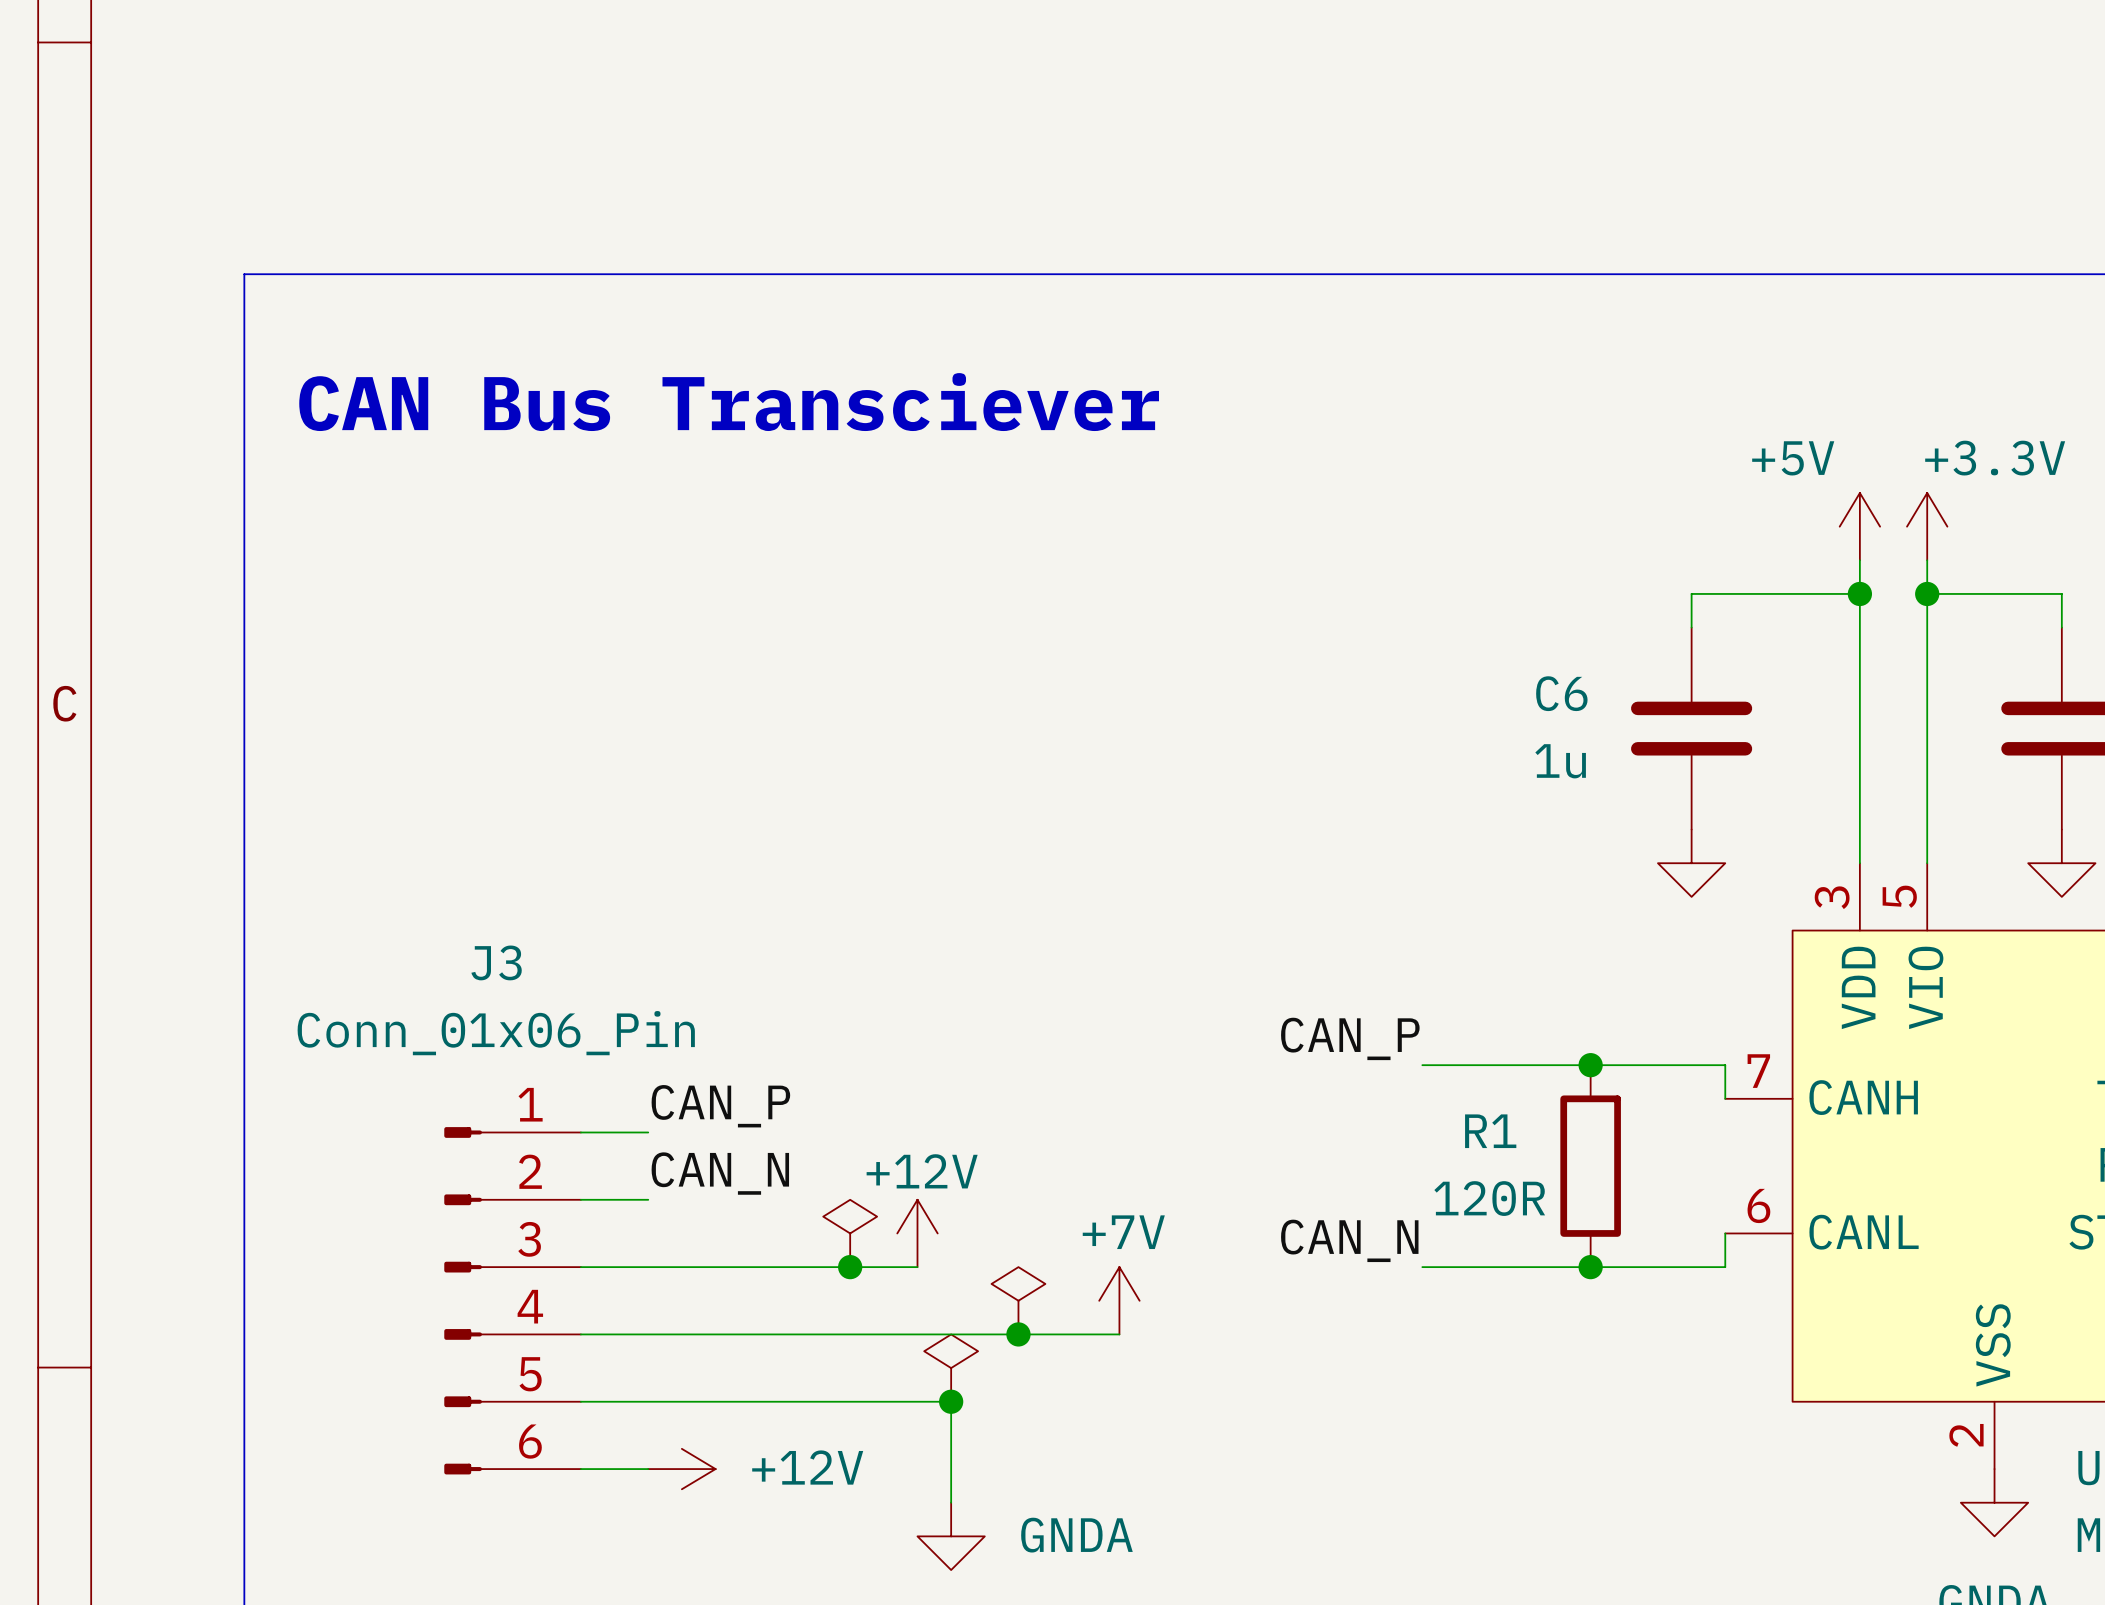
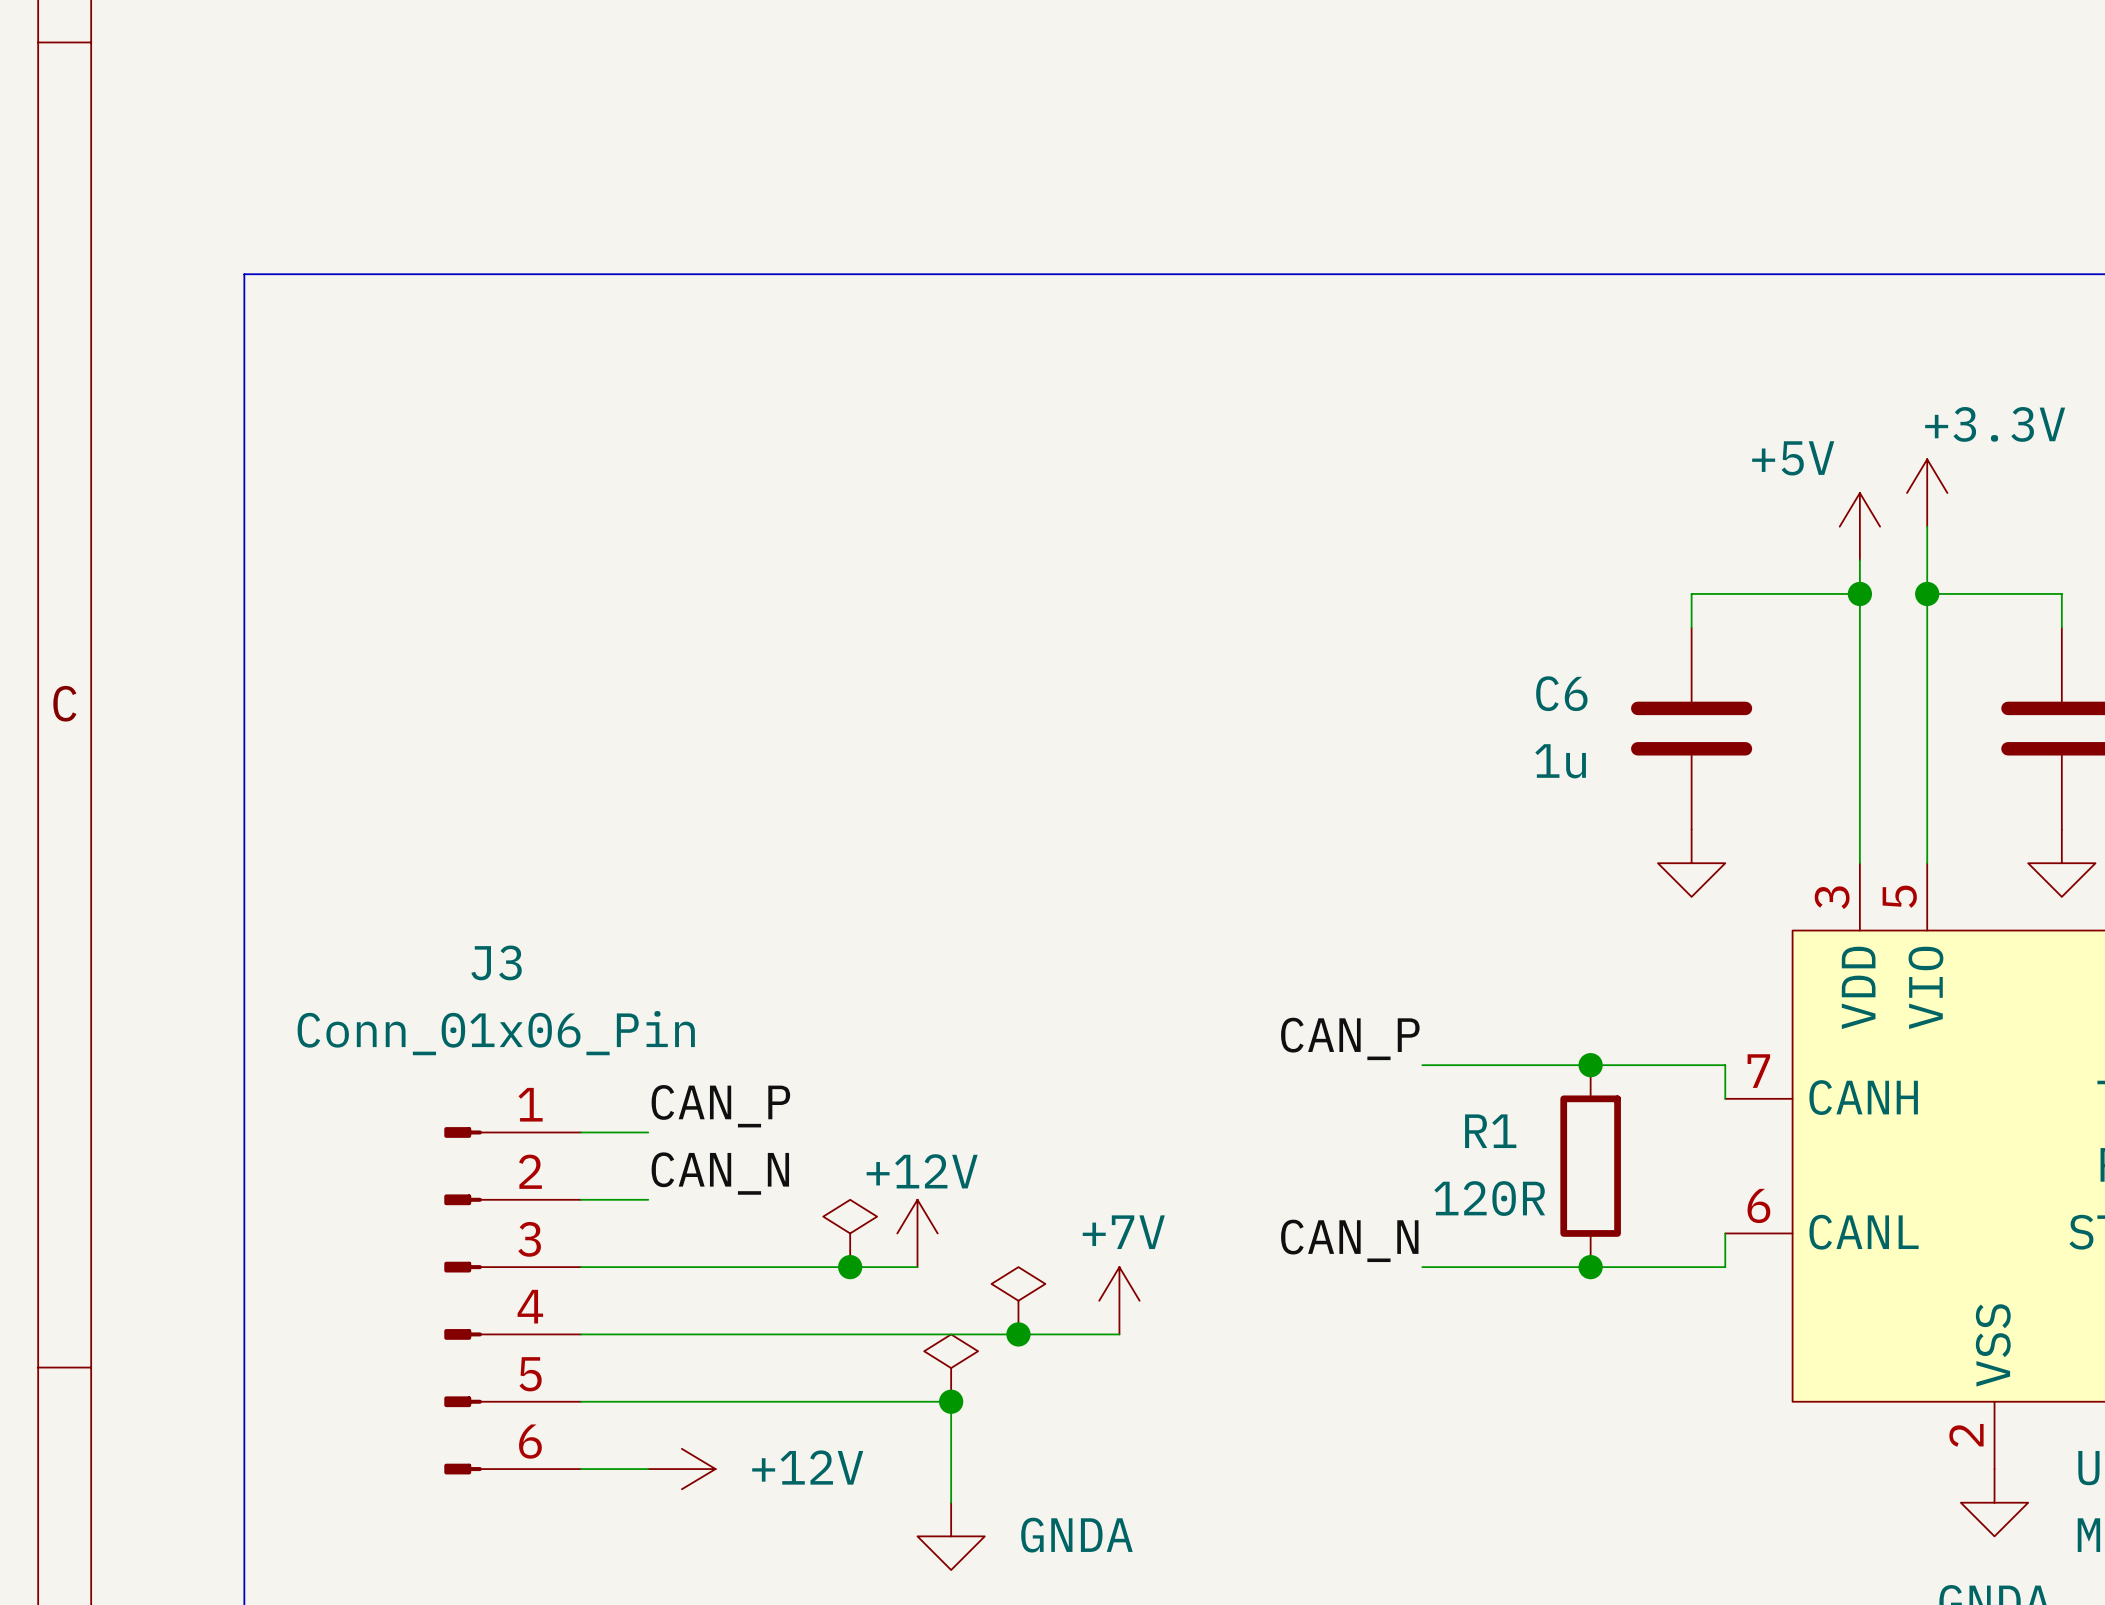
text: CAN Bus Transciever (729, 402) -> none
power symbol position: +3.3V (1927, 526) -> +3.3V (1927, 492)

